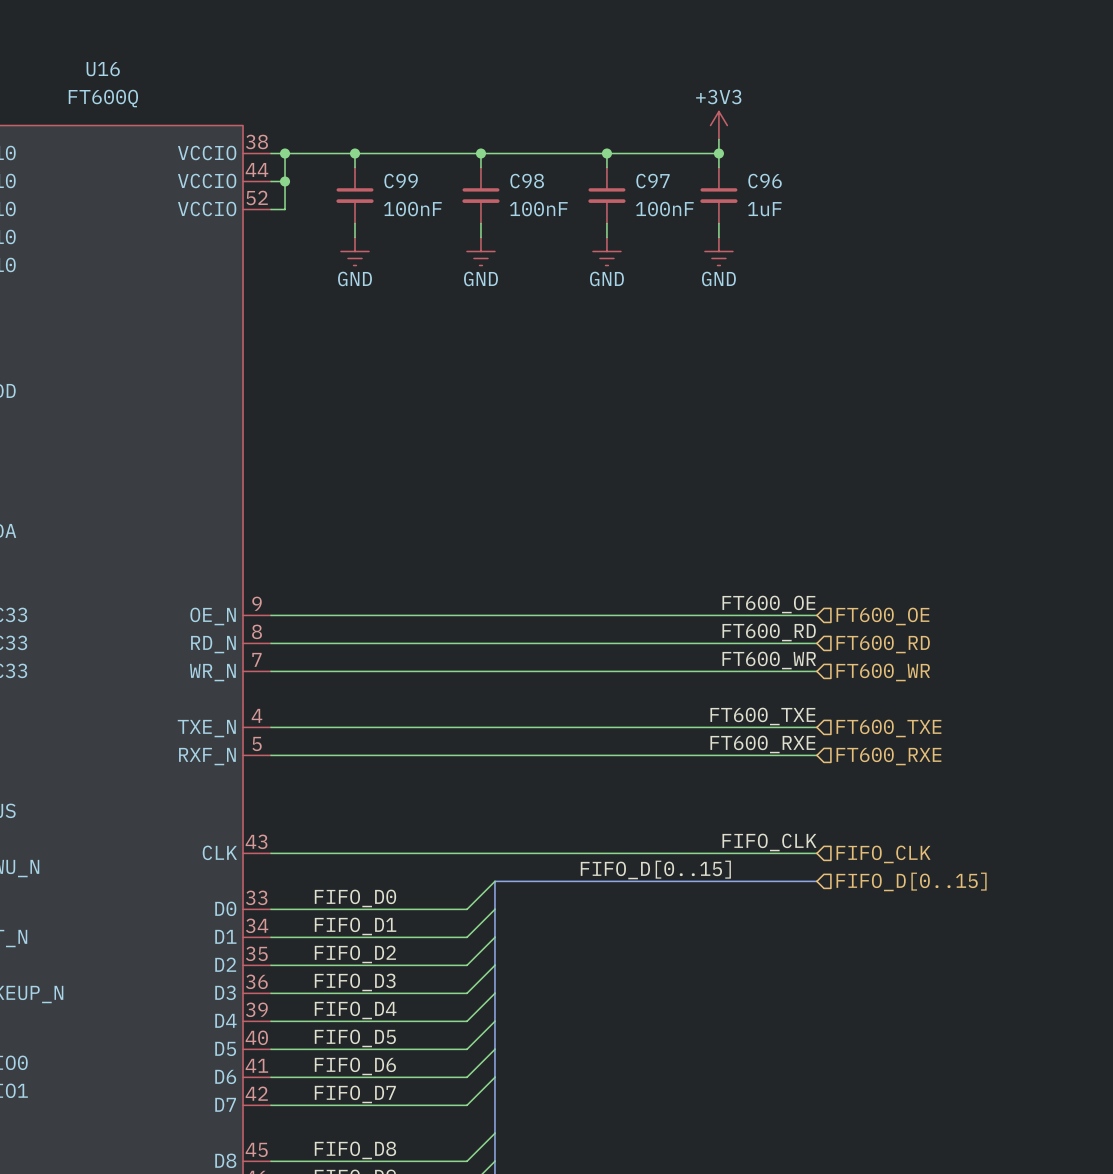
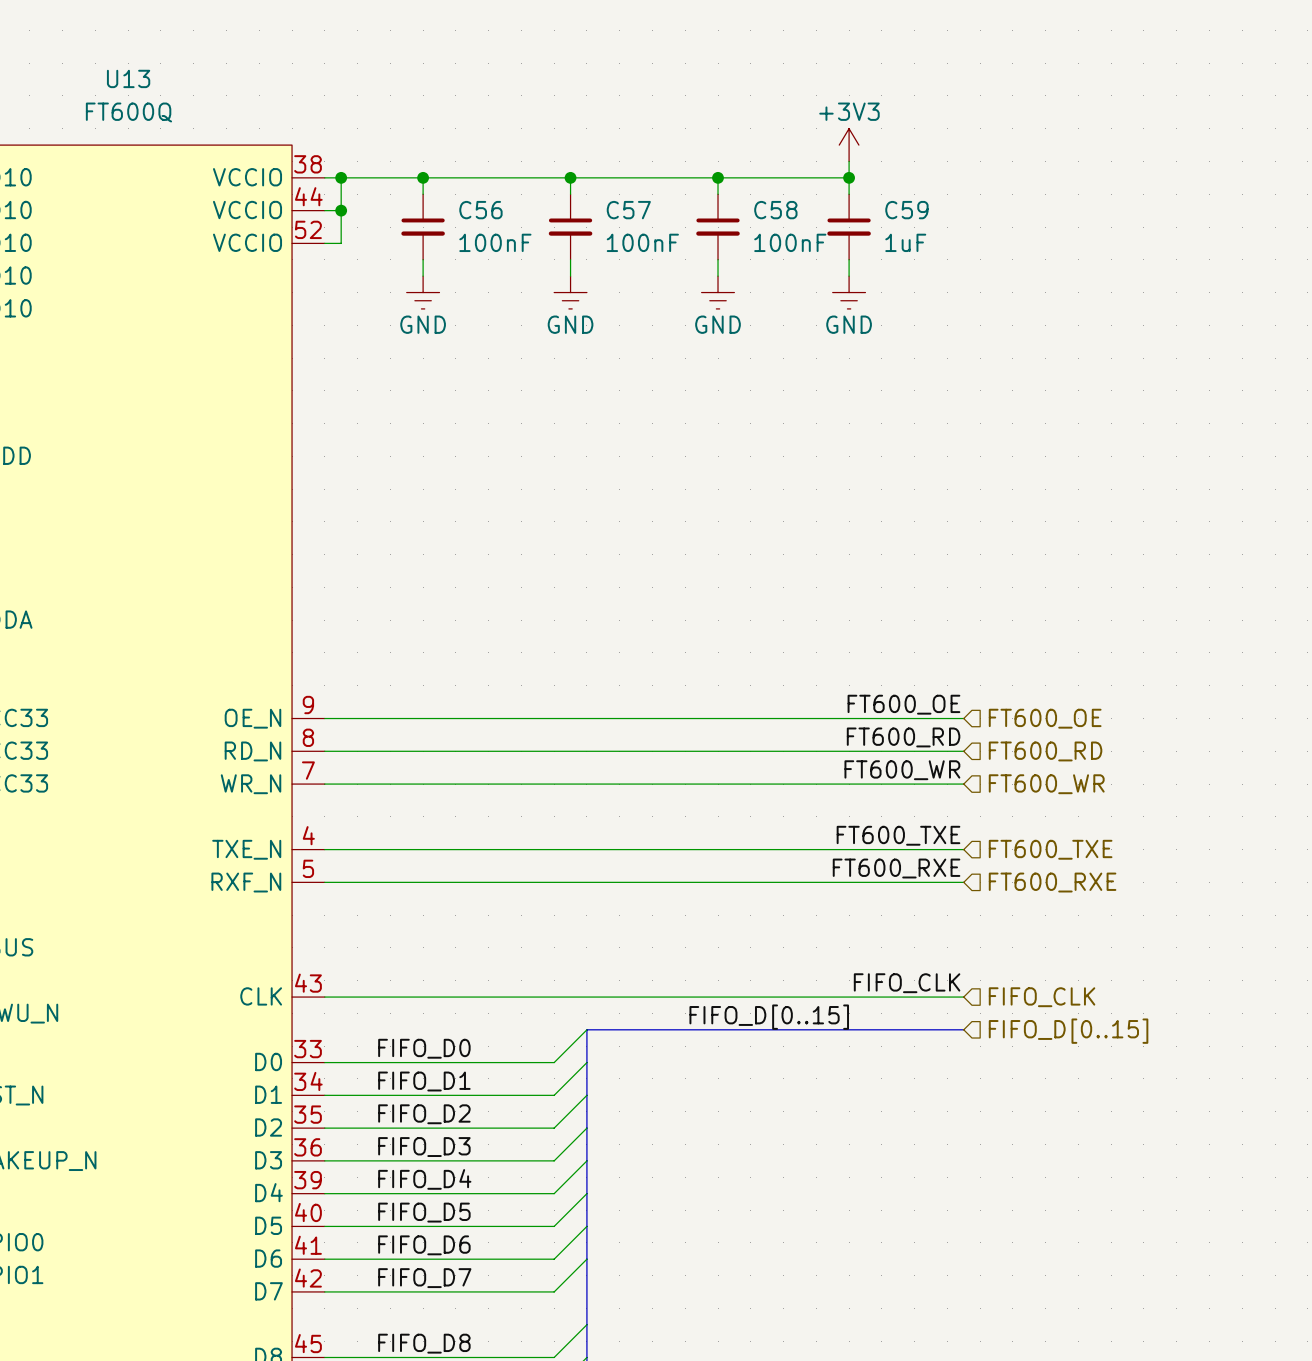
U16 name: U16 (103, 69) -> U13 (128, 78)
C99 name: C99 (401, 181) -> C56 (480, 210)
C98 name: C98 (527, 181) -> C57 (628, 210)
C97 name: C97 (653, 181) -> C58 (775, 210)
C96 name: C96 (765, 181) -> C59 (906, 210)

